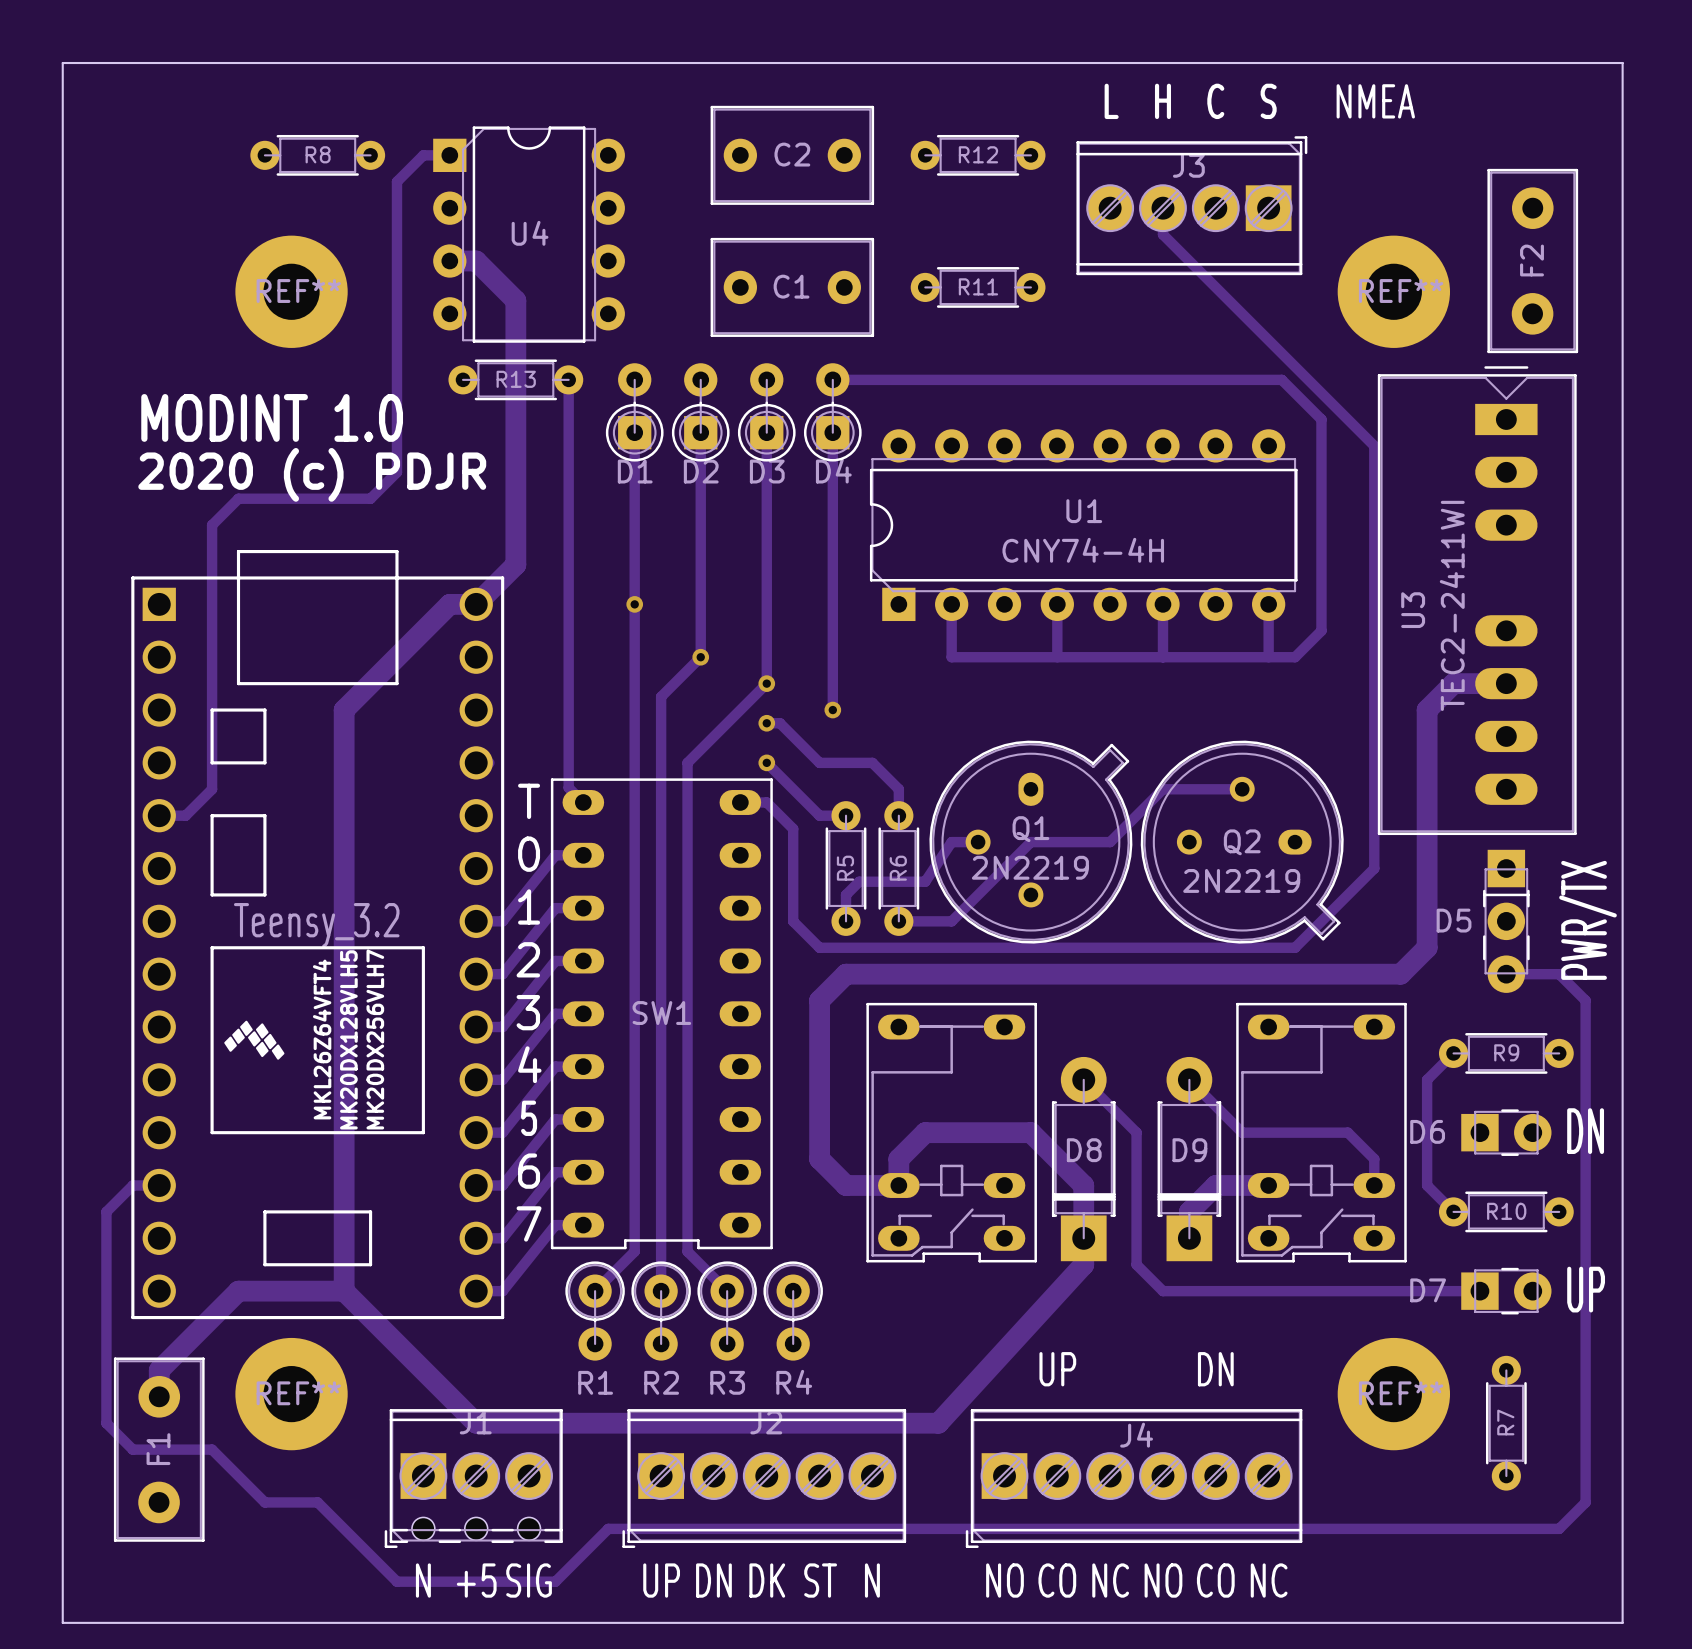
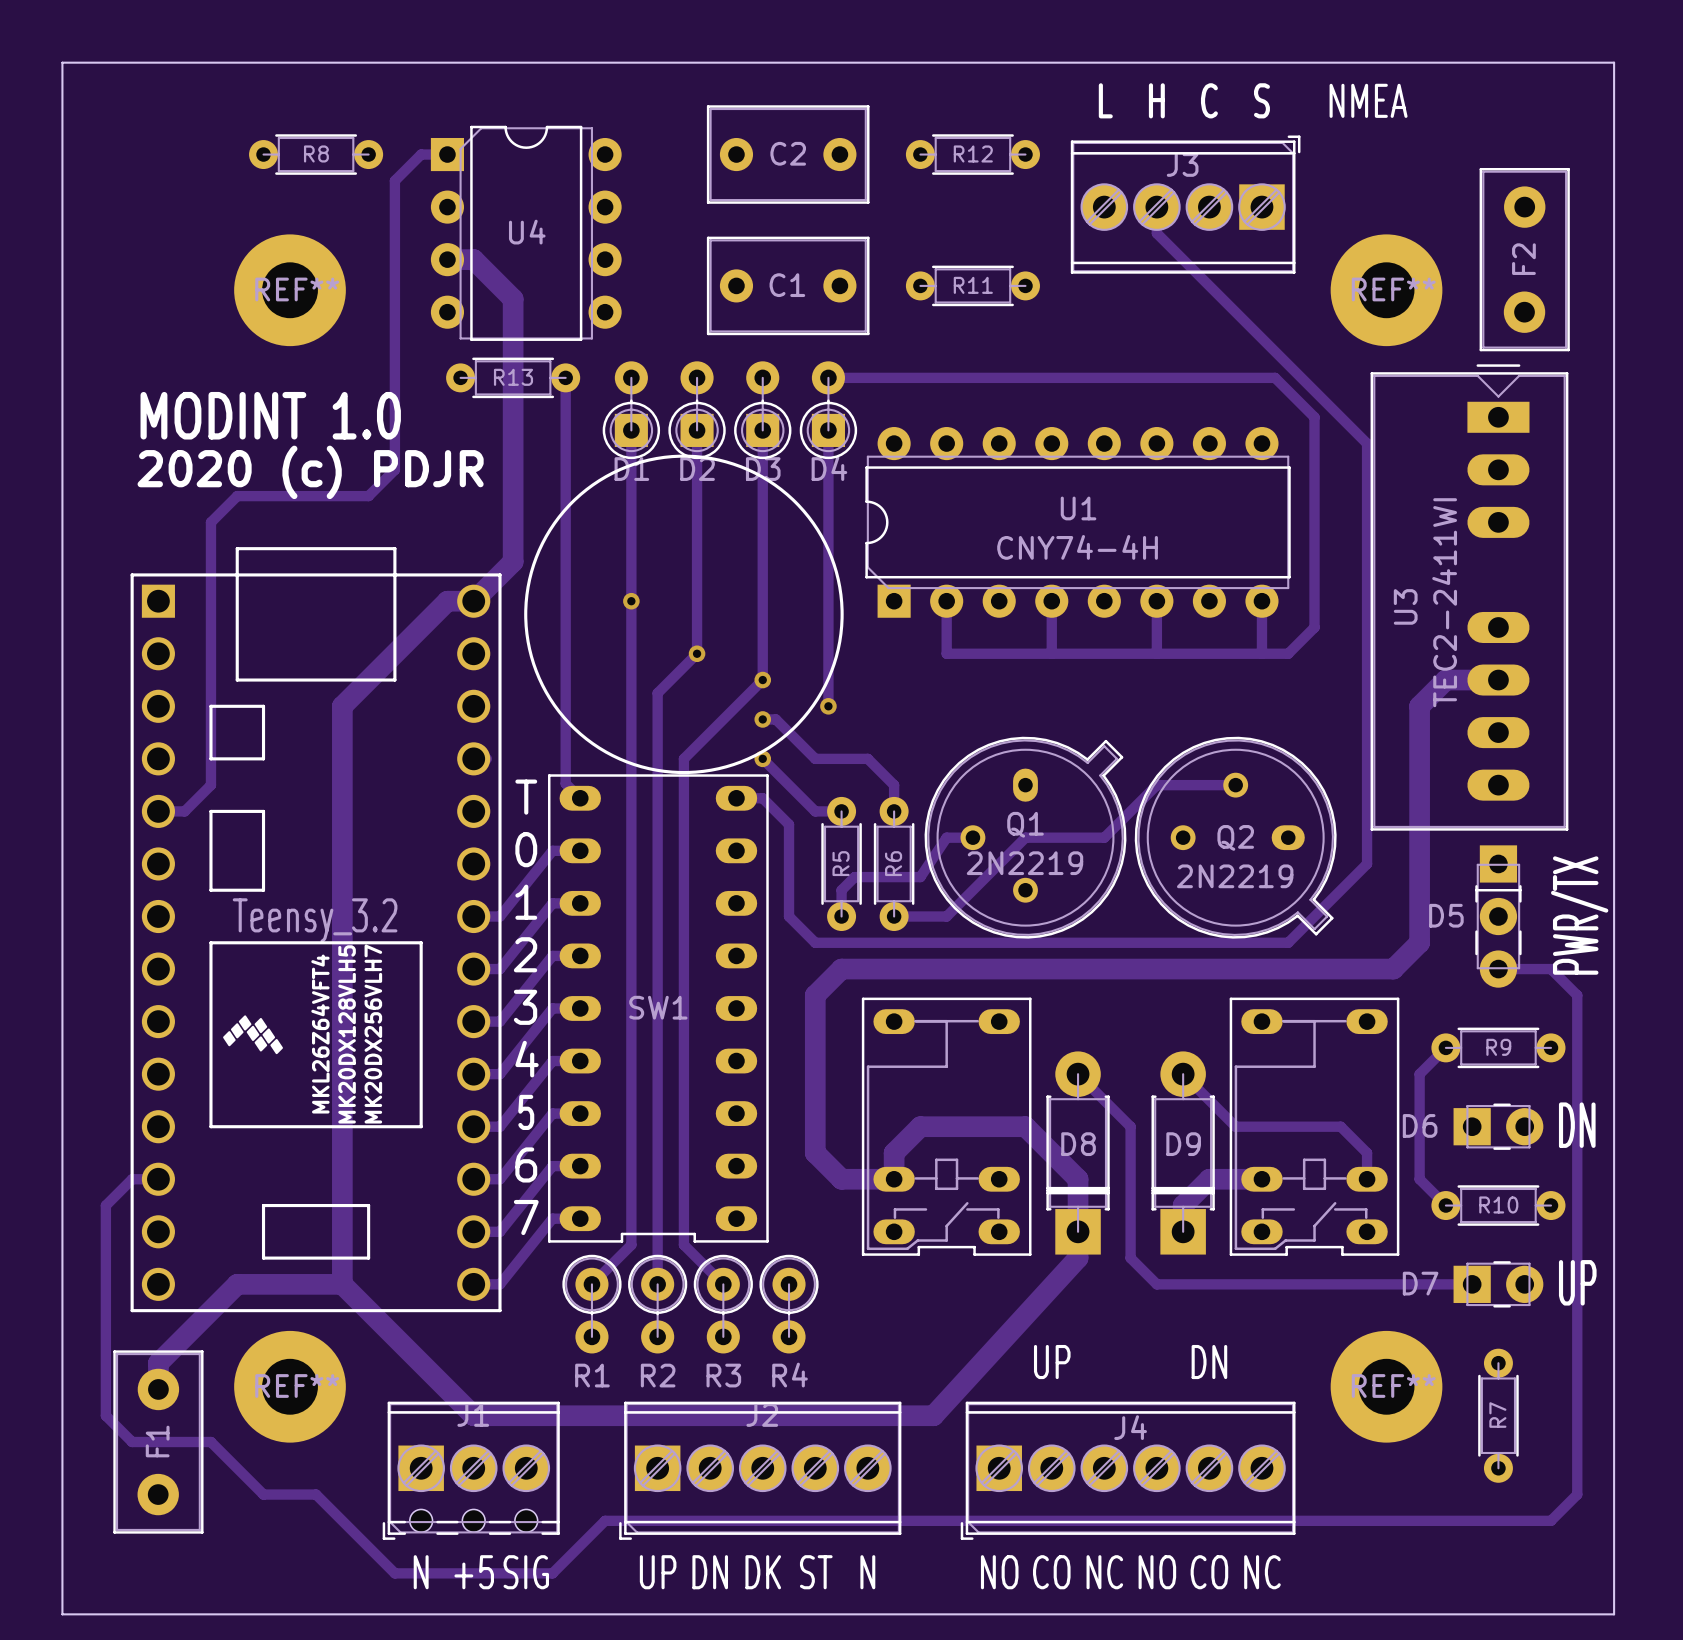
drawing: none -> [524, 454, 844, 775]

